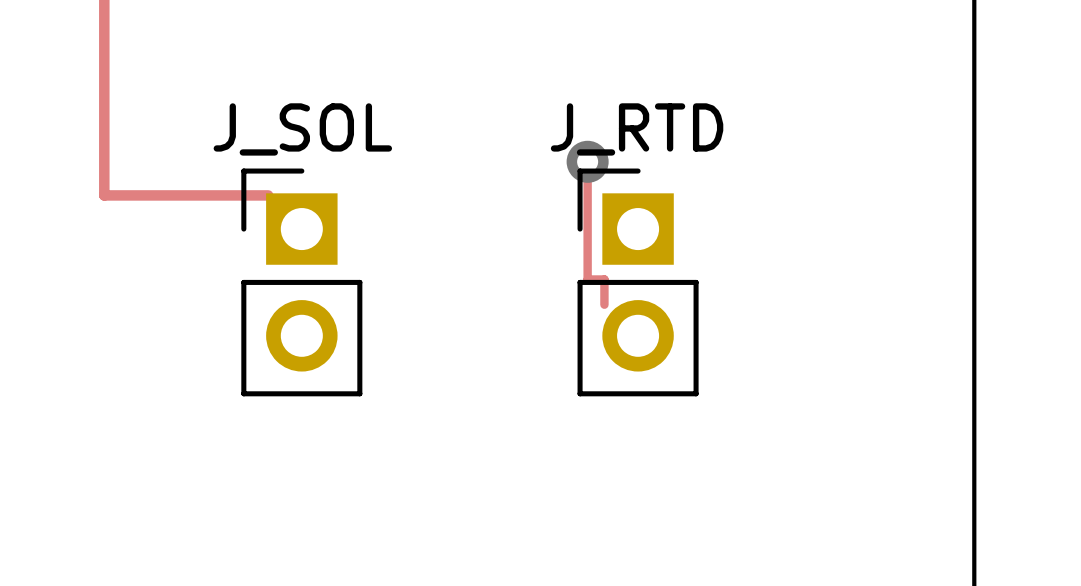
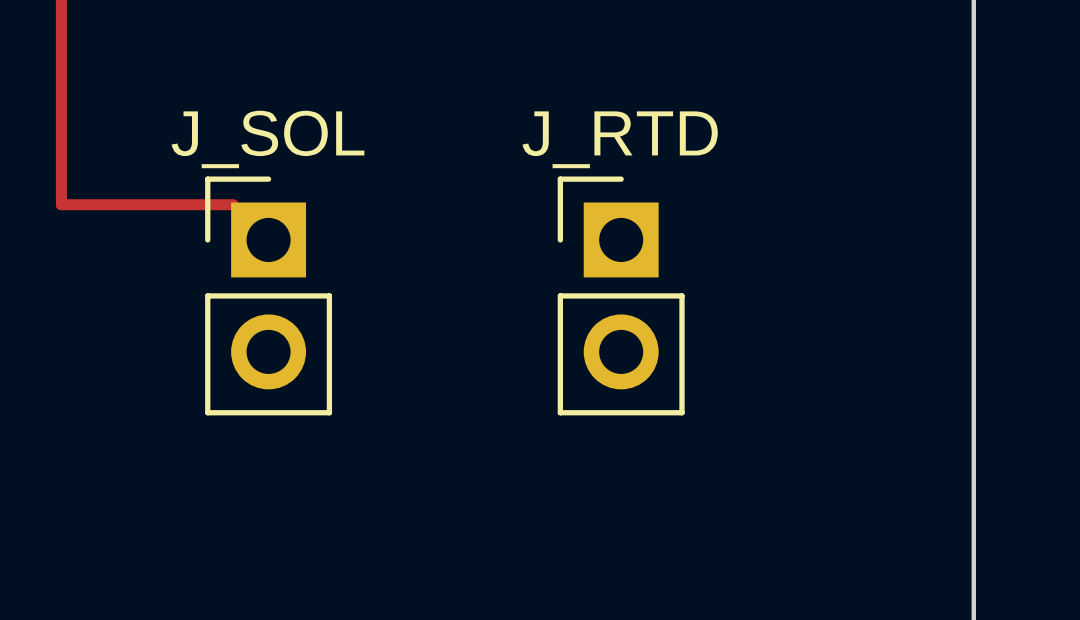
track: (587, 161) (587, 279) (604, 279) (604, 304) -> none
via: (587, 161) -> none

